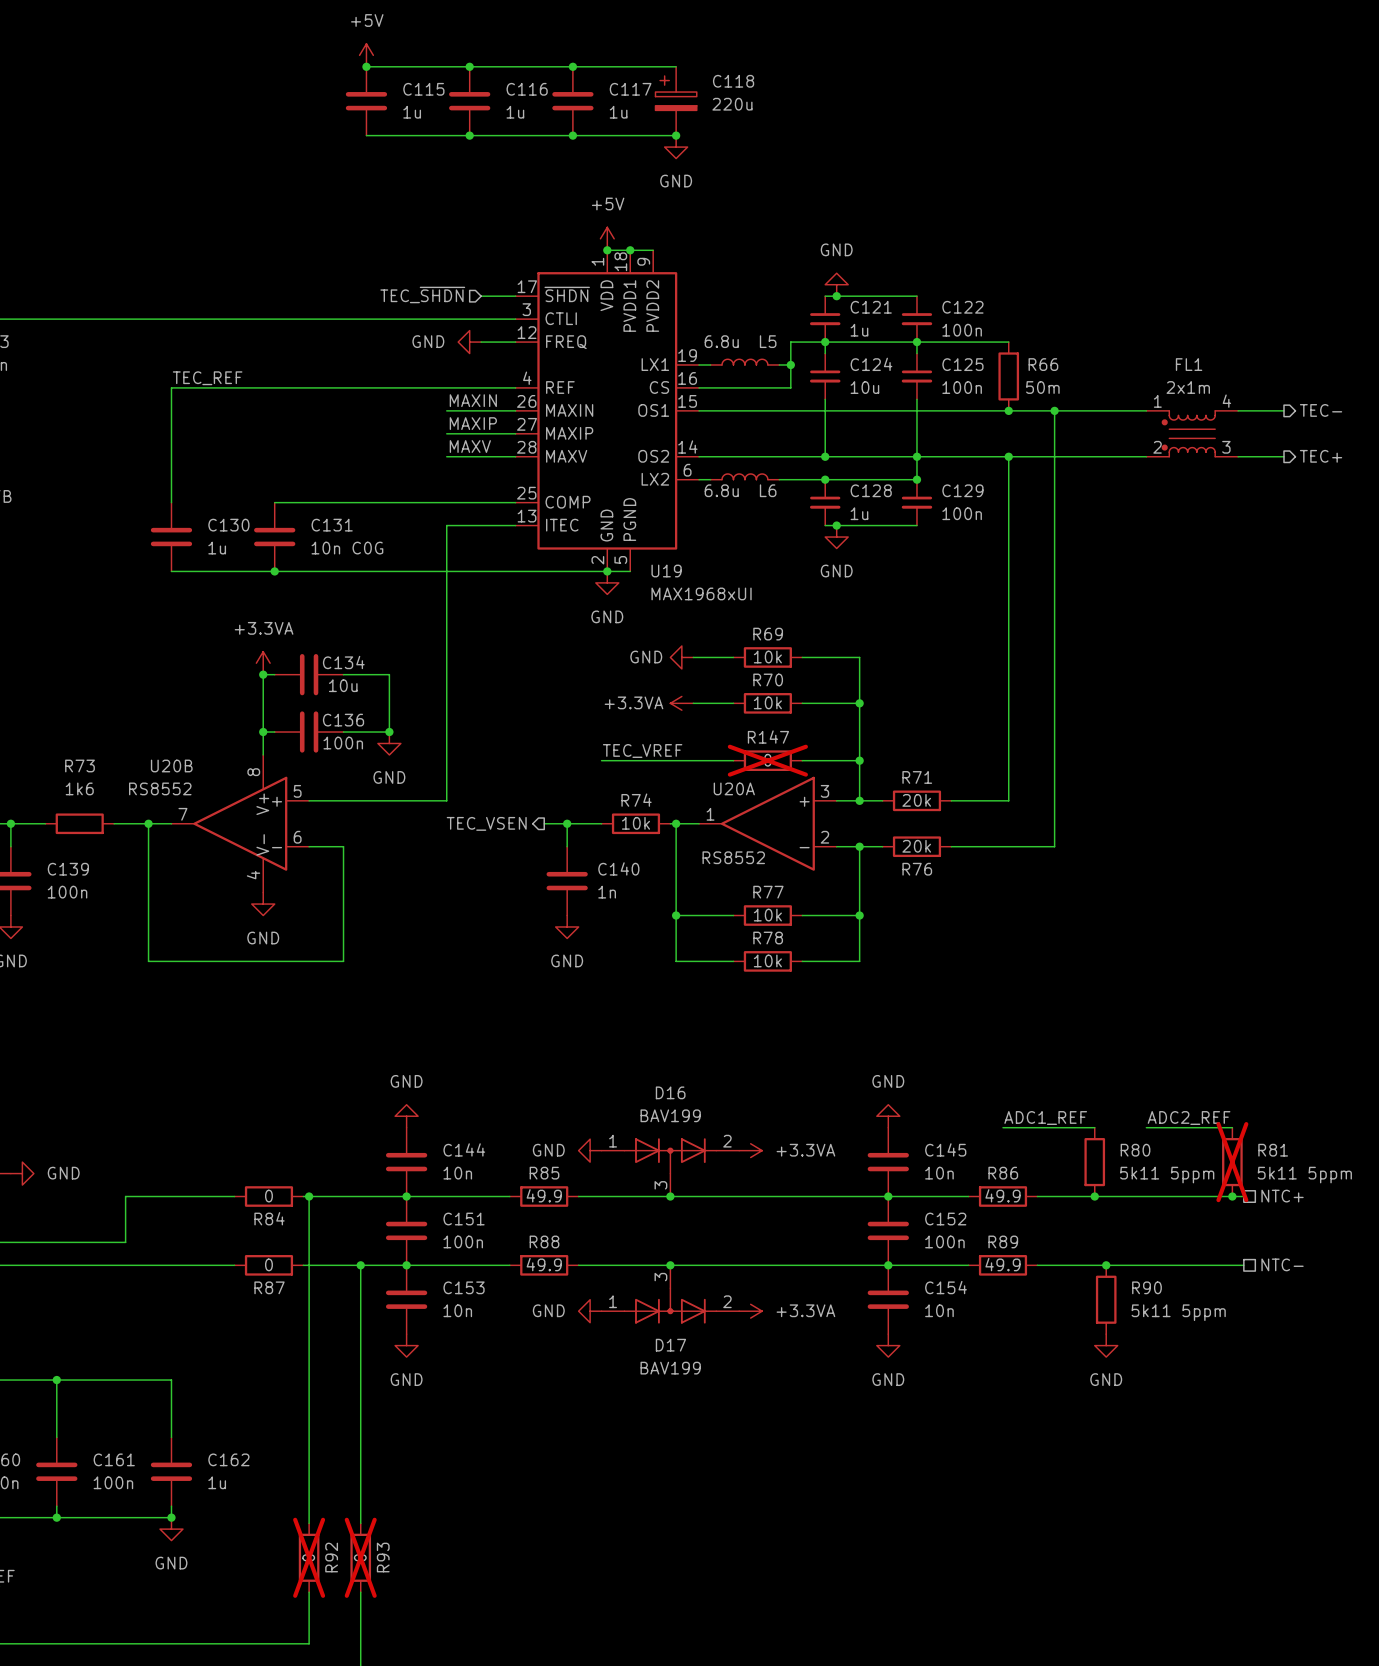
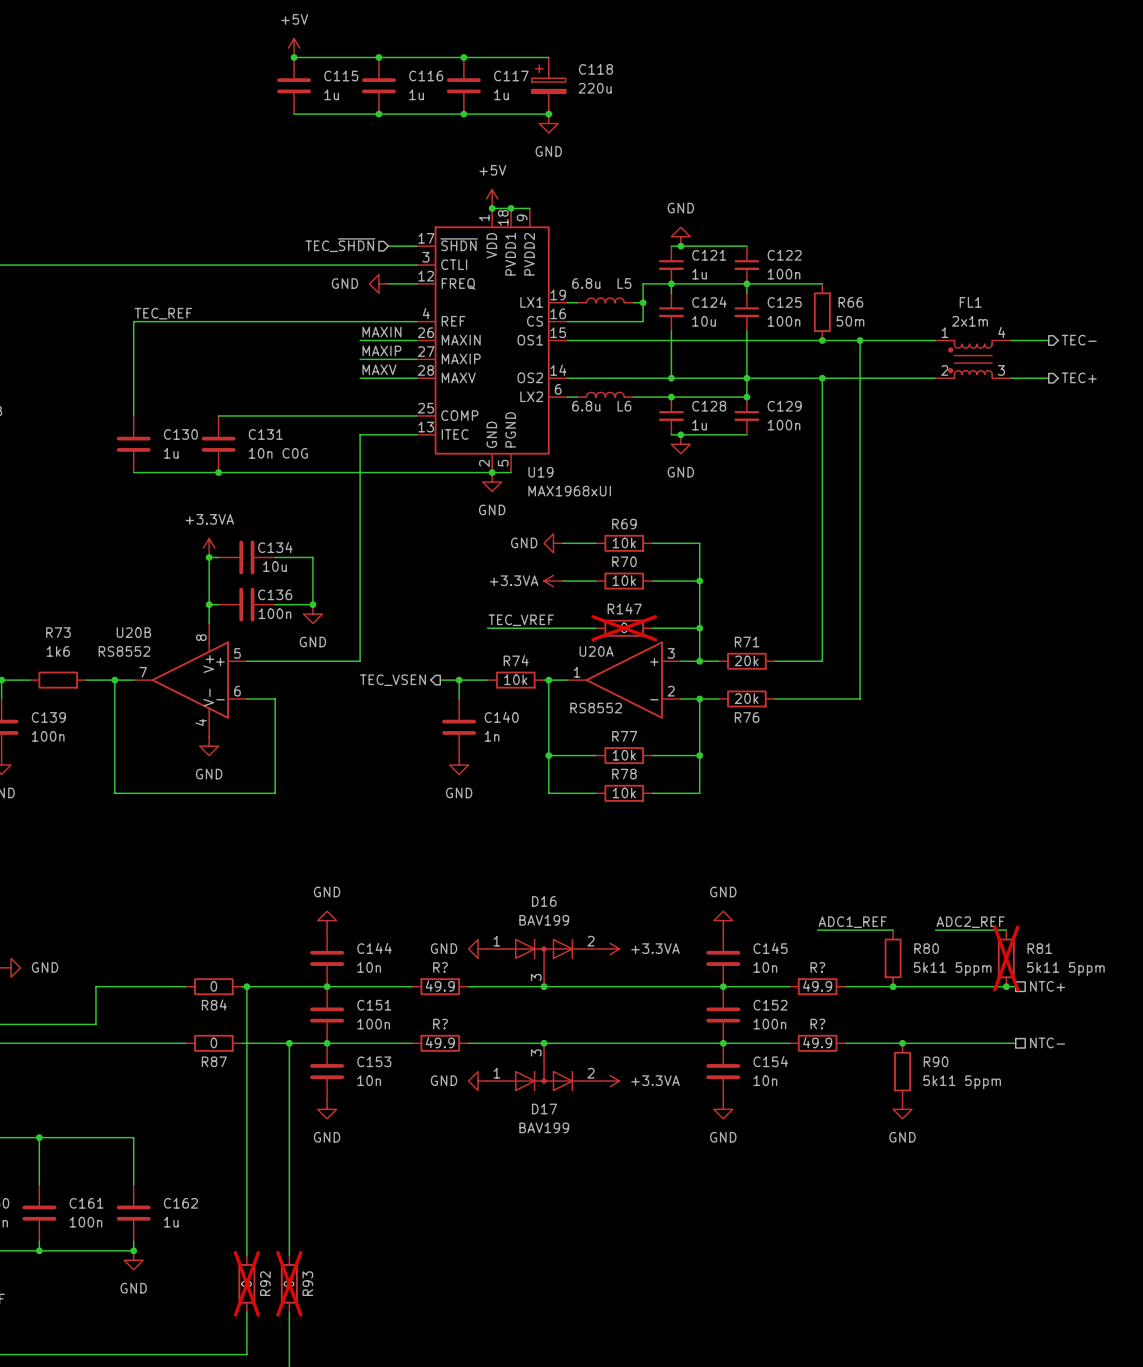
R85 name: R85 (544, 1173) -> R? (440, 967)
R86 name: R86 (1003, 1173) -> R? (817, 967)
R88 name: R88 (544, 1241) -> R? (440, 1024)
R89 name: R89 (1003, 1241) -> R? (817, 1024)

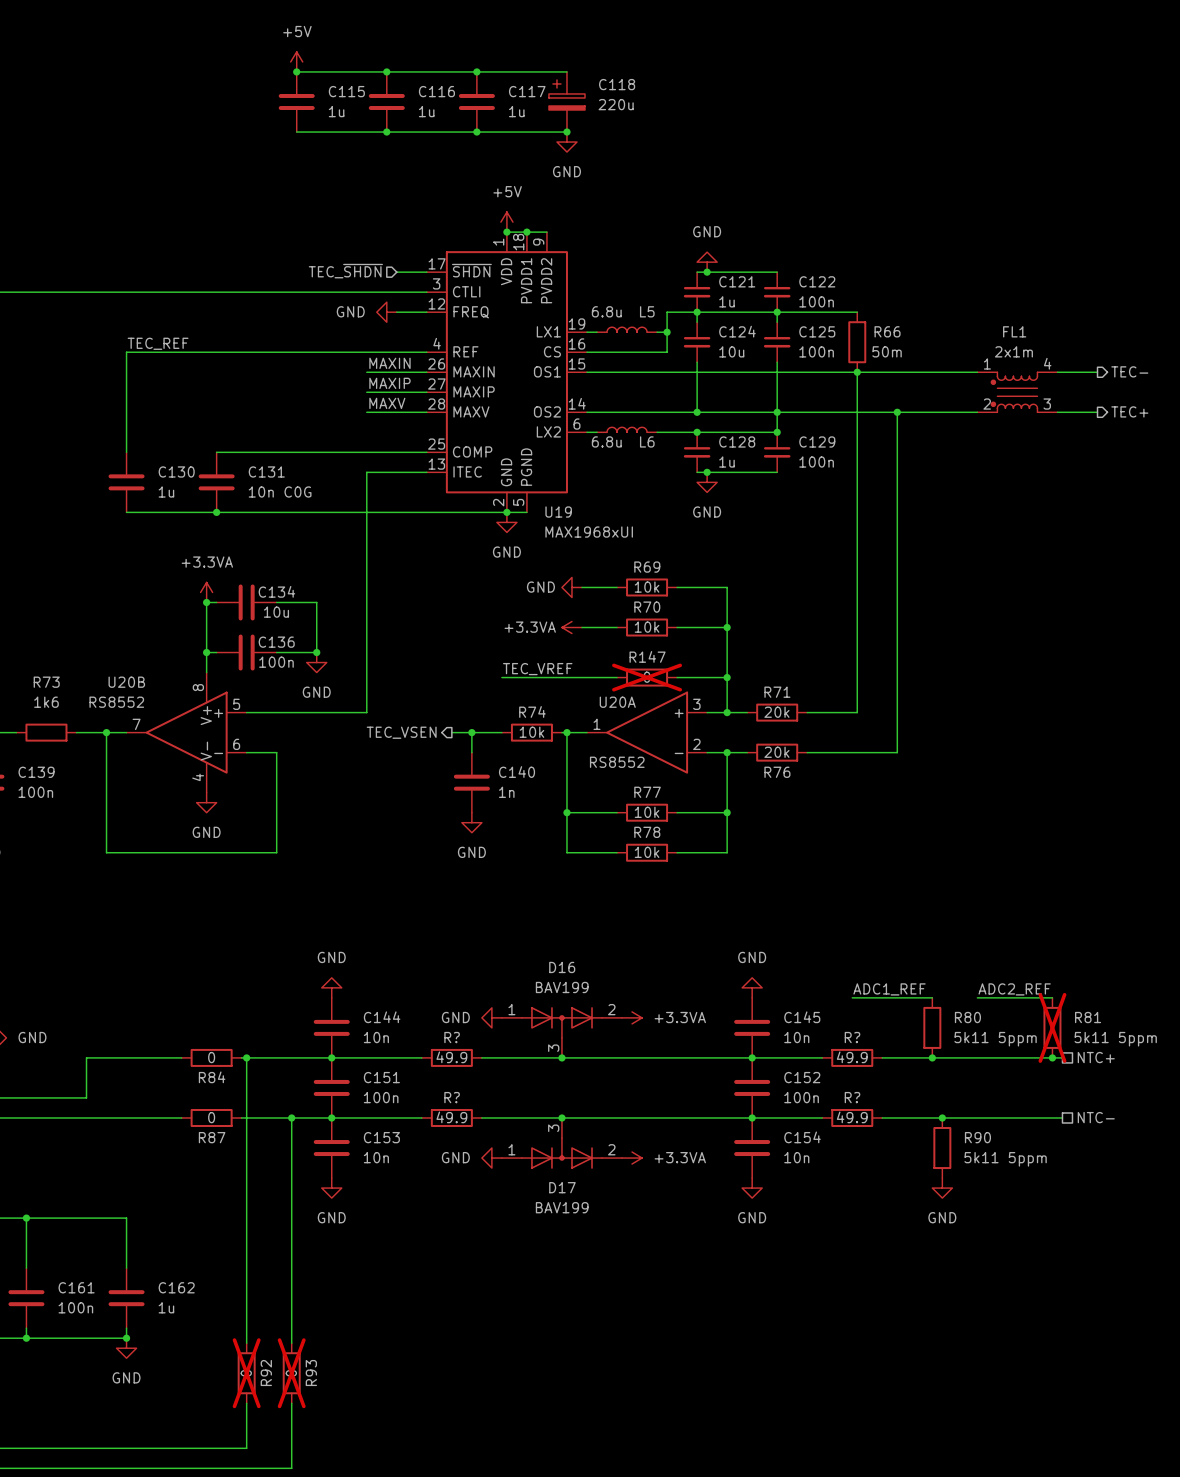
wire: (860, 340) (860, 378) -> (857, 372) (857, 412)
junction: (860, 340) -> none
junction: (822, 378) -> none
junction: none -> (897, 412)

